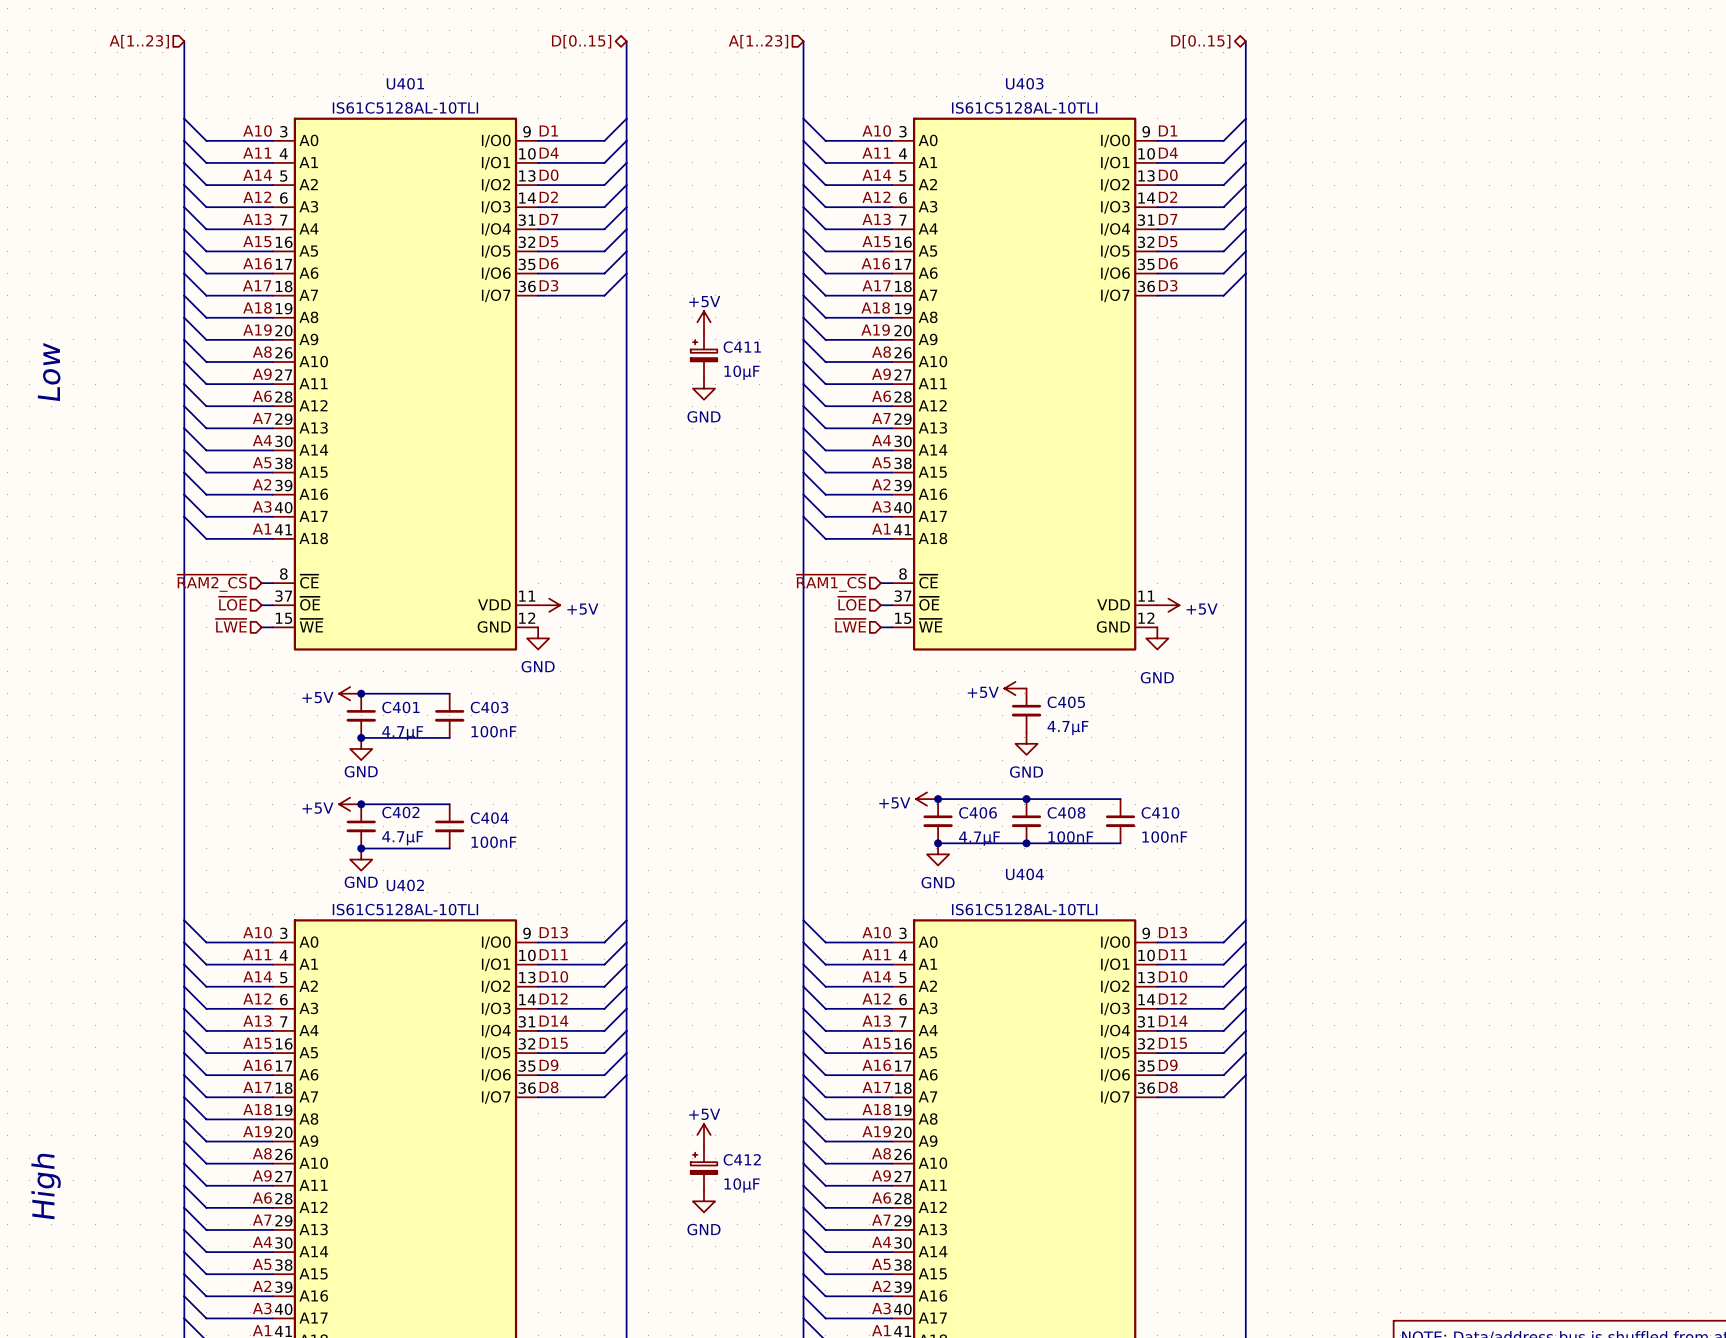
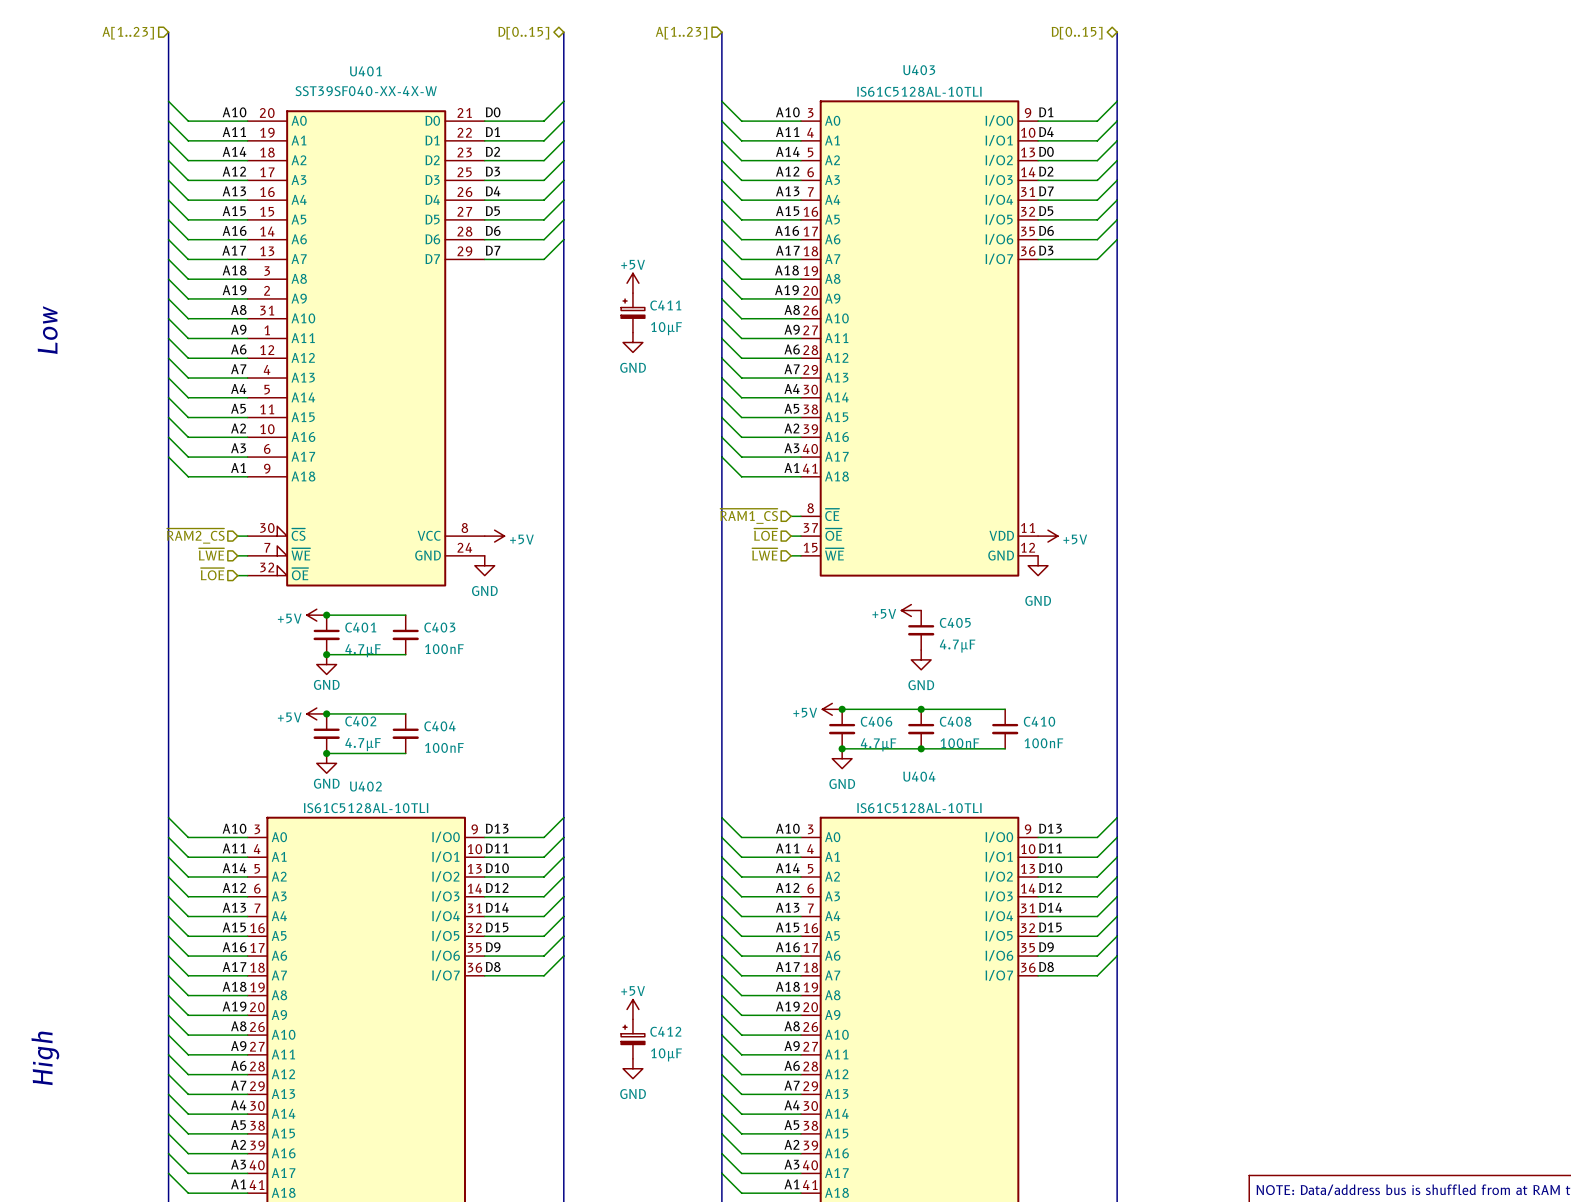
U401 value: IS61C5128AL-10TLI (405, 107) -> SST39SF040-XX-4X-W (366, 91)
U401 symbol: [272, 117, 539, 651] -> [247, 110, 485, 587]
label: D1 (548, 130) -> D0 (493, 112)
label: D4 (549, 153) -> D1 (492, 132)
label: D0 (549, 175) -> D2 (492, 151)
label: D2 (548, 197) -> D3 (492, 171)
label: D7 (548, 219) -> D4 (493, 191)
label: D3 (548, 285) -> D7 (493, 250)
hierarchical label: ~{RAM2_CS} (212, 583) -> none
wire: (261, 583) (272, 583) -> (237, 575) (247, 575)
hierarchical label: ~{LOE} (232, 603) -> ~{RAM2_CS} (195, 536)
hierarchical label: none -> ~{LOE} (212, 574)

